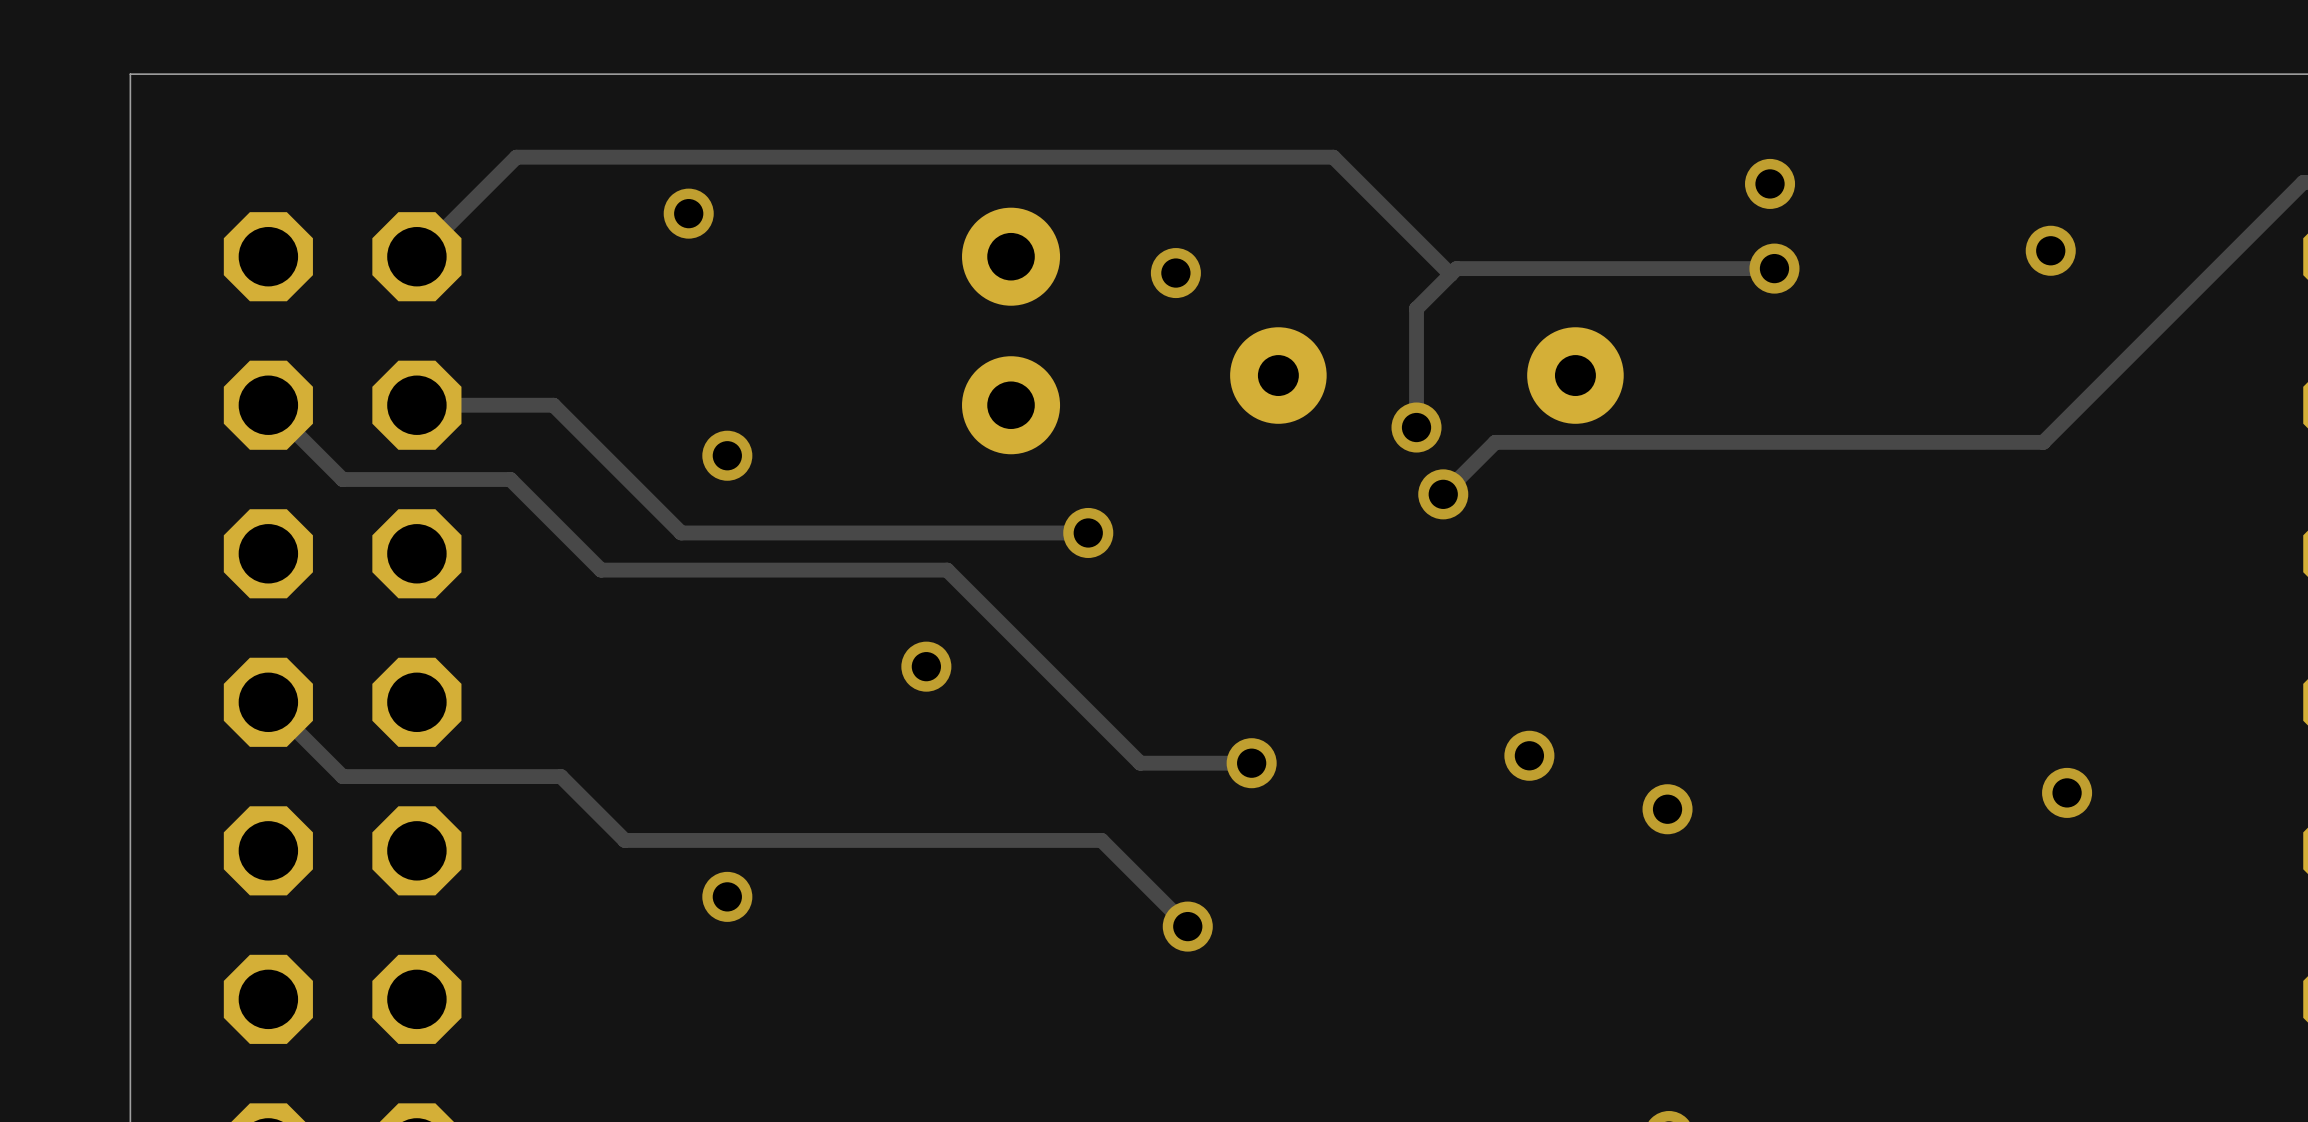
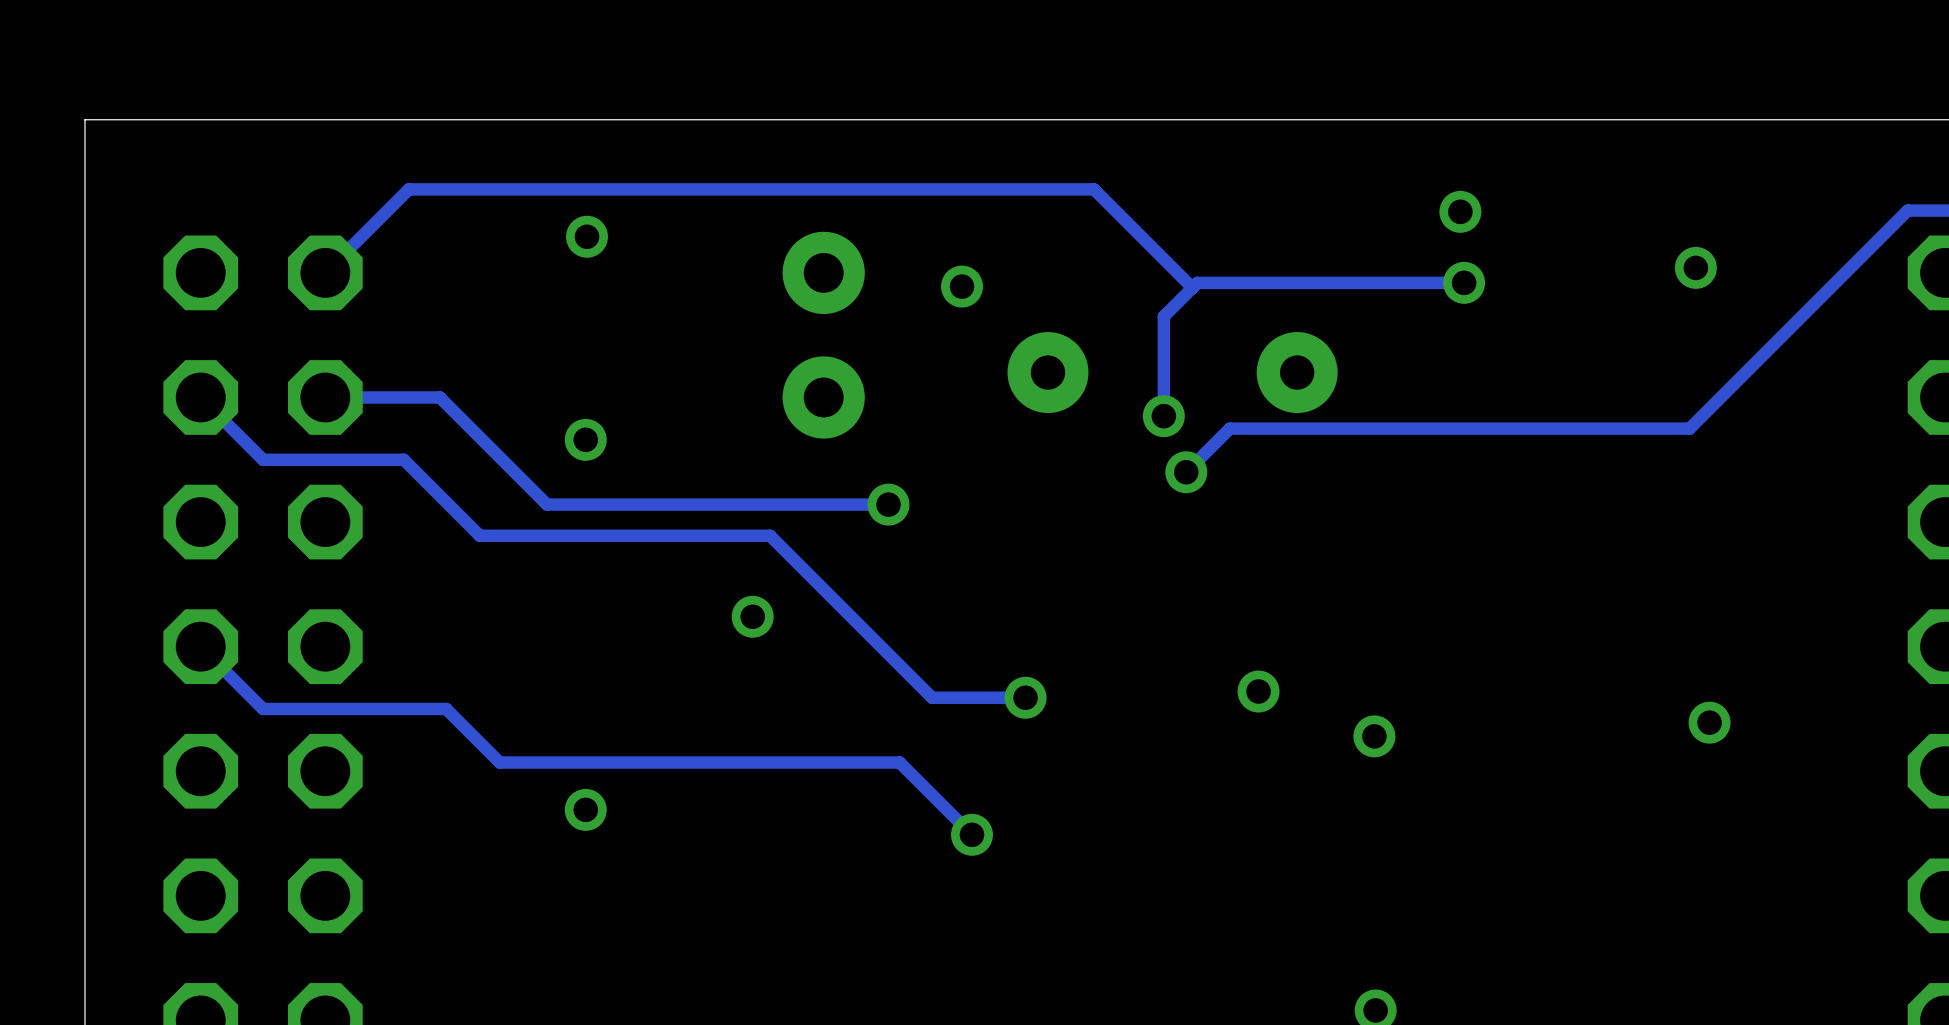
via position: (688, 213) -> (586, 236)

